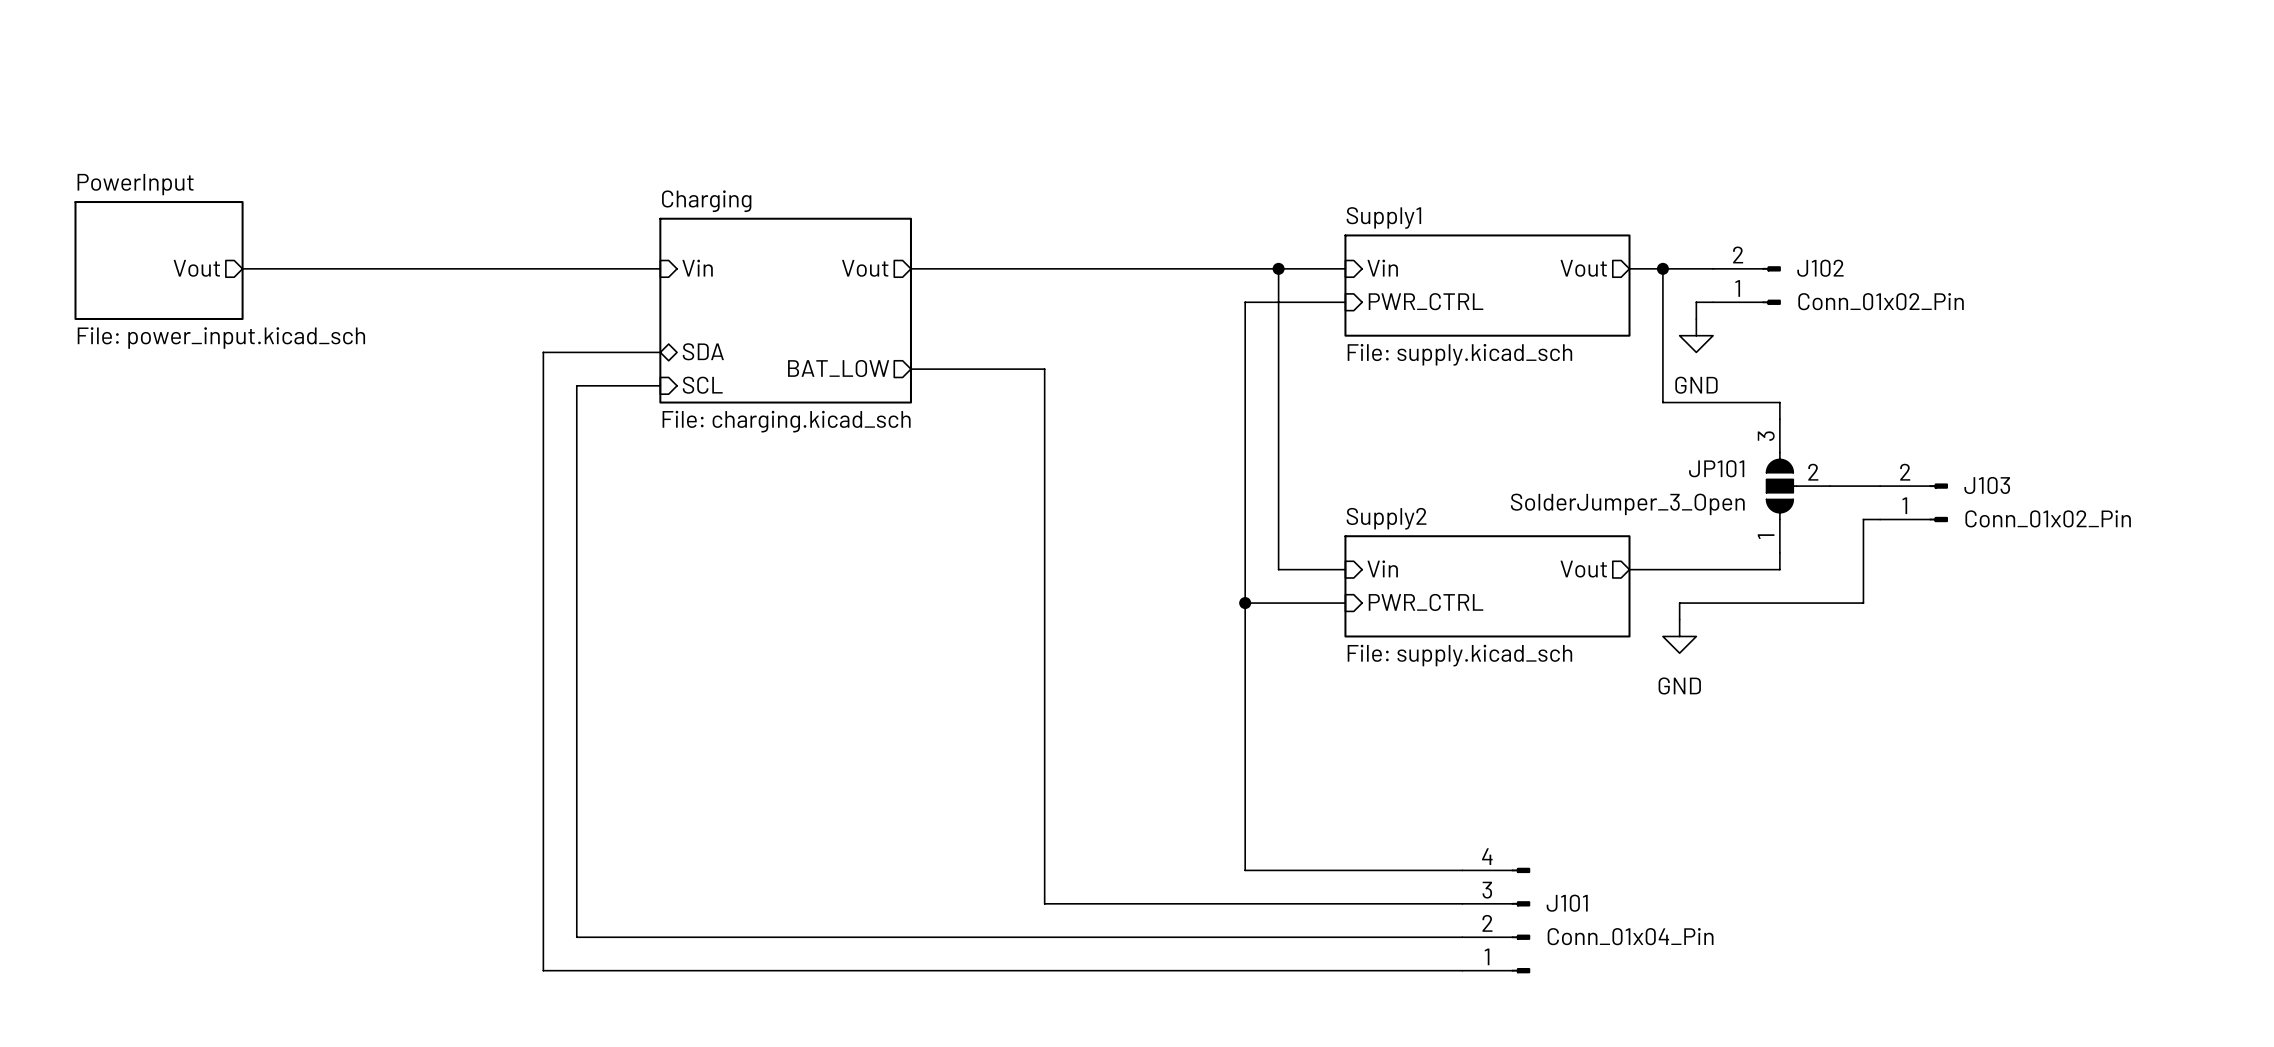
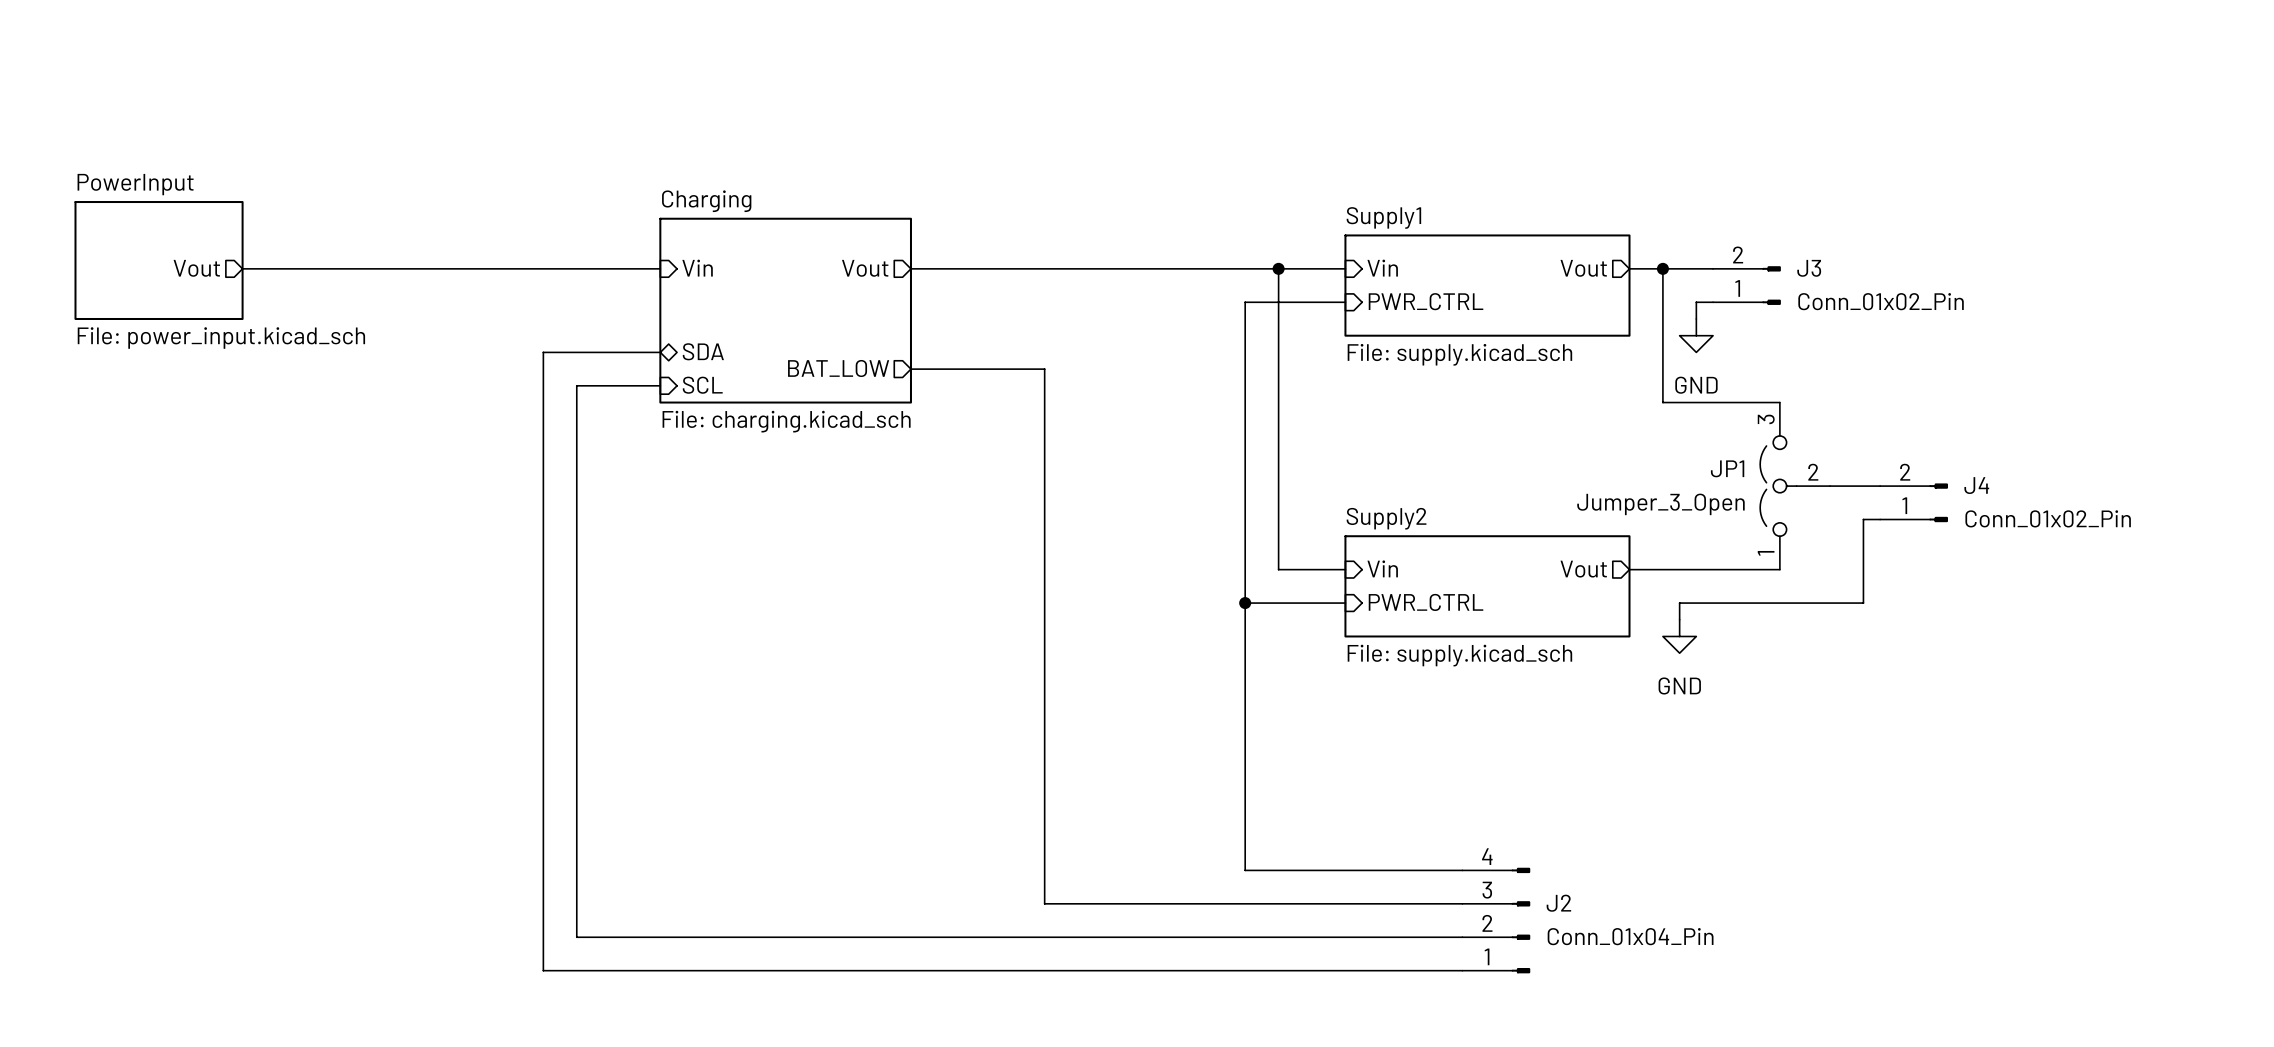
J102 name: J102 (1820, 268) -> J3 (1809, 268)
J103 name: J103 (1987, 485) -> J4 (1976, 485)
JP1: none -> Jumper_3_Open (1795, 486)
JP101: SolderJumper_3_Open (1798, 486) -> none
J101 name: J101 (1567, 903) -> J2 (1558, 903)

